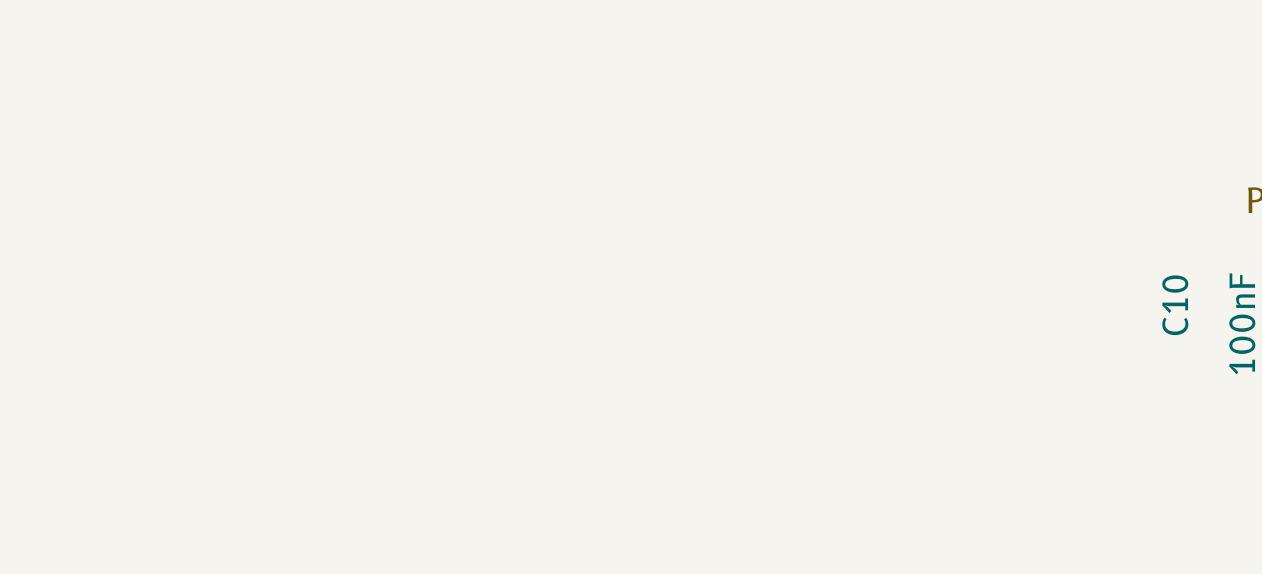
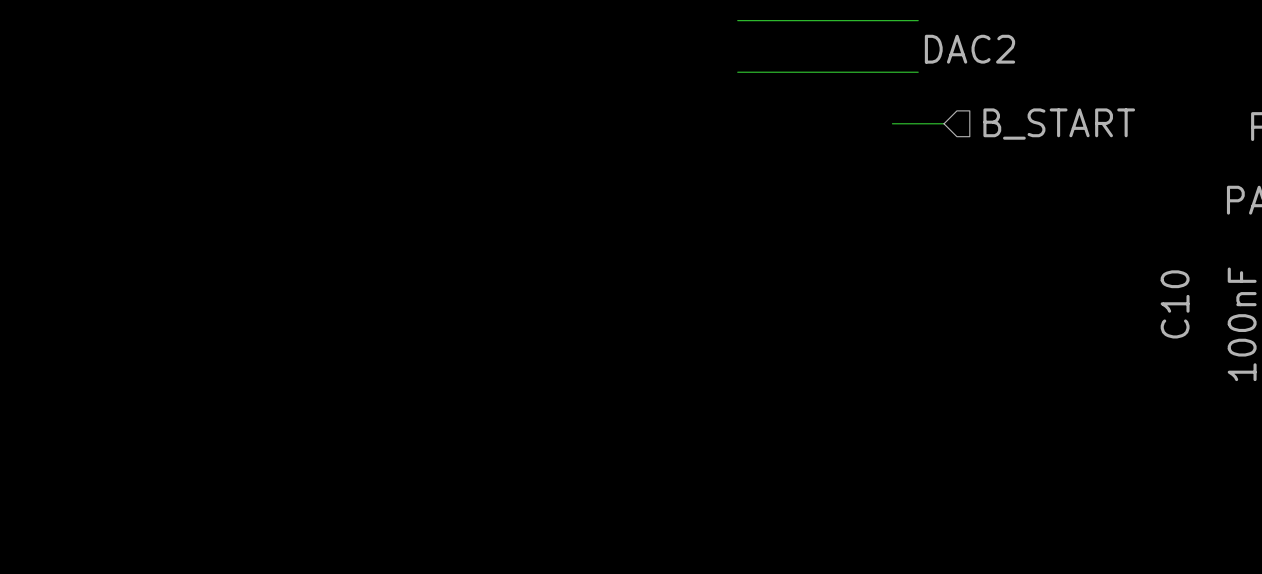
wire: none -> (737, 20) (918, 20)
label: none -> DAC2 (969, 49)
wire: none -> (737, 72) (918, 72)
wire: none -> (892, 123) (944, 123)
hierarchical label: none -> B_START (1059, 124)

